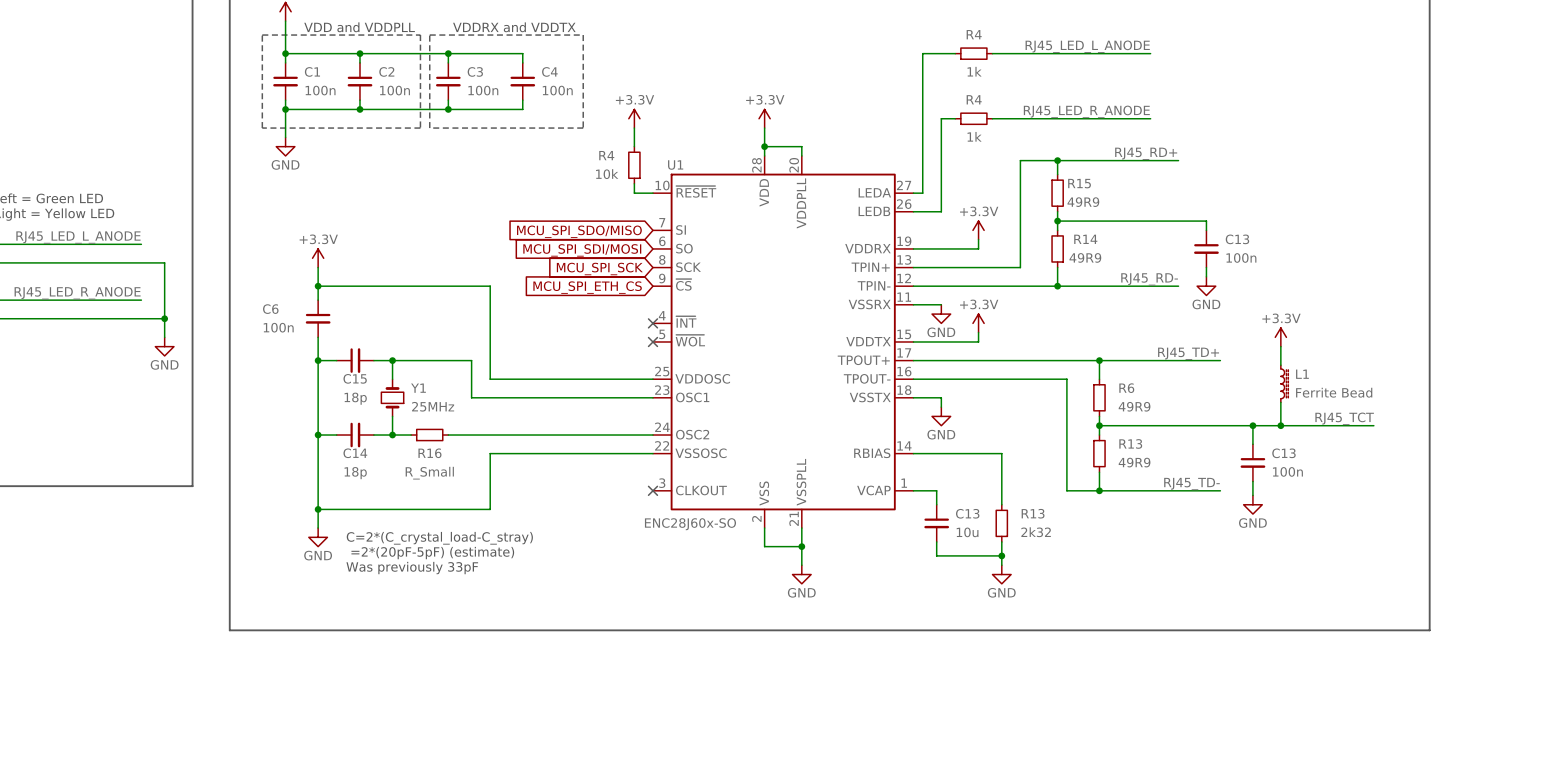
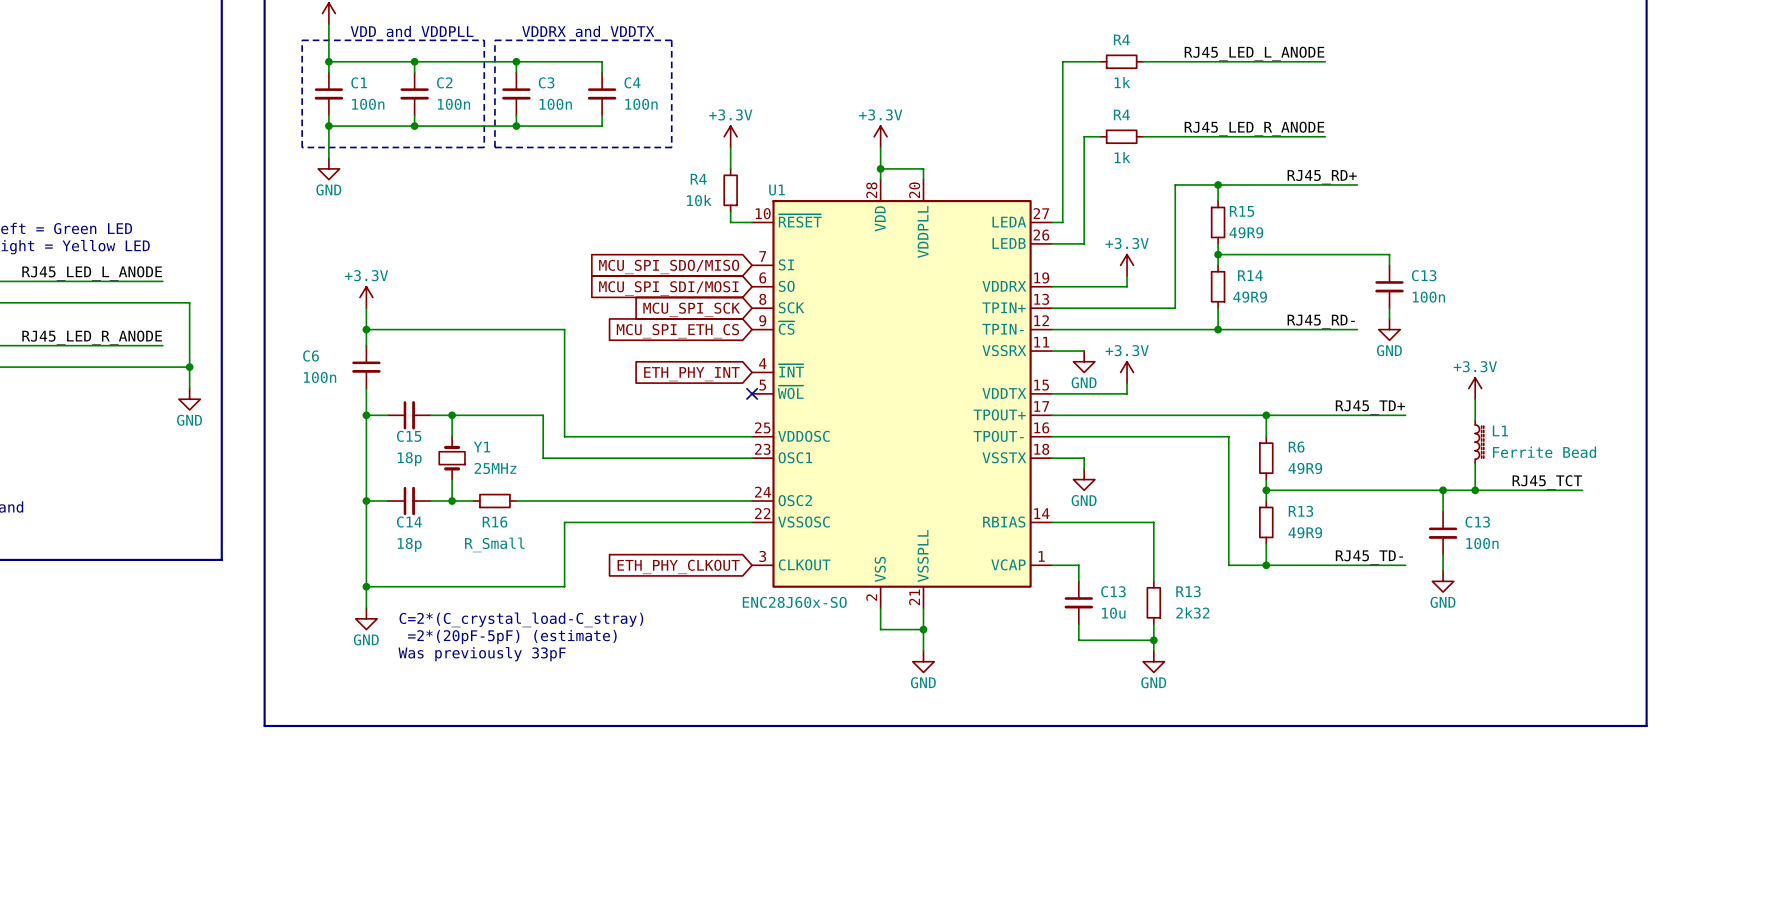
no-connect mark: (652, 323) -> none
global label: none -> ETH_PHY_INT (691, 374)
no-connect mark: (652, 490) -> none
global label: none -> ETH_PHY_CLKOUT (678, 566)

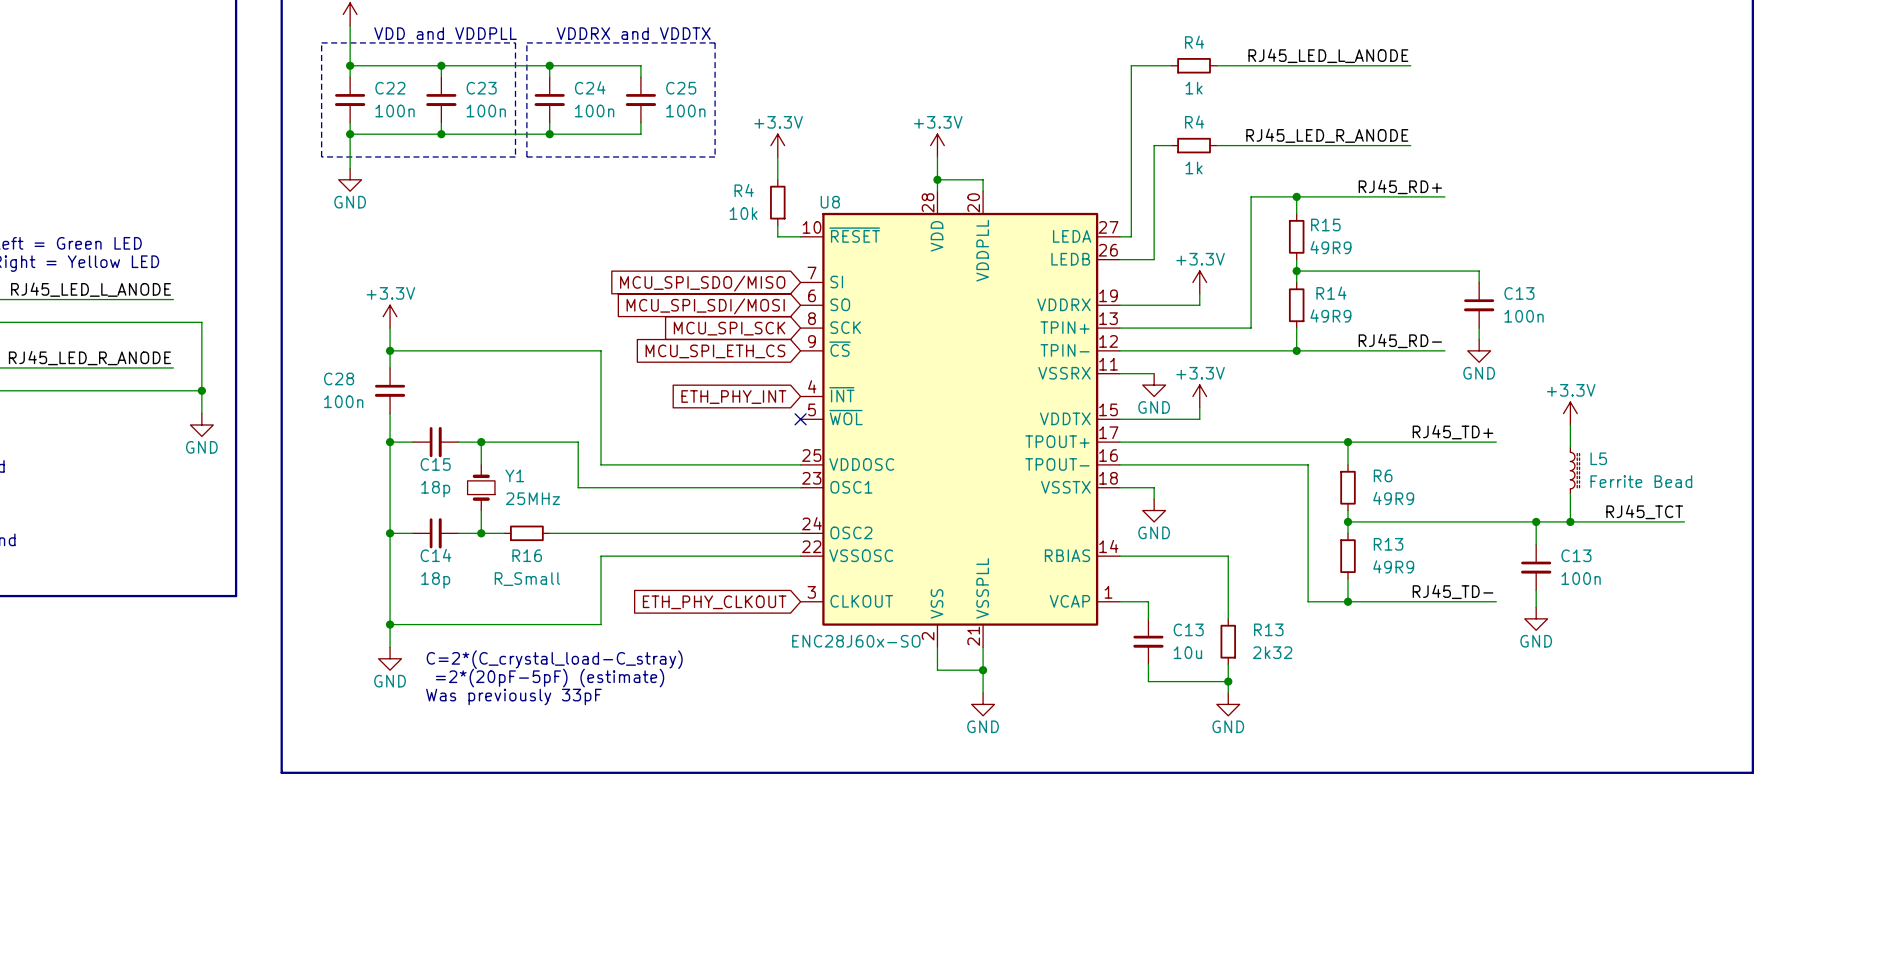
C1 name: C1 (359, 82) -> C22 (390, 88)
C2 name: C2 (444, 82) -> C23 (481, 88)
C3 name: C3 (546, 82) -> C24 (590, 87)
C4 name: C4 (632, 82) -> C25 (681, 88)
U1 name: U1 (777, 190) -> U8 (830, 202)
C6 name: C6 (310, 355) -> C28 (339, 378)
L1 name: L1 (1500, 430) -> L5 (1598, 458)

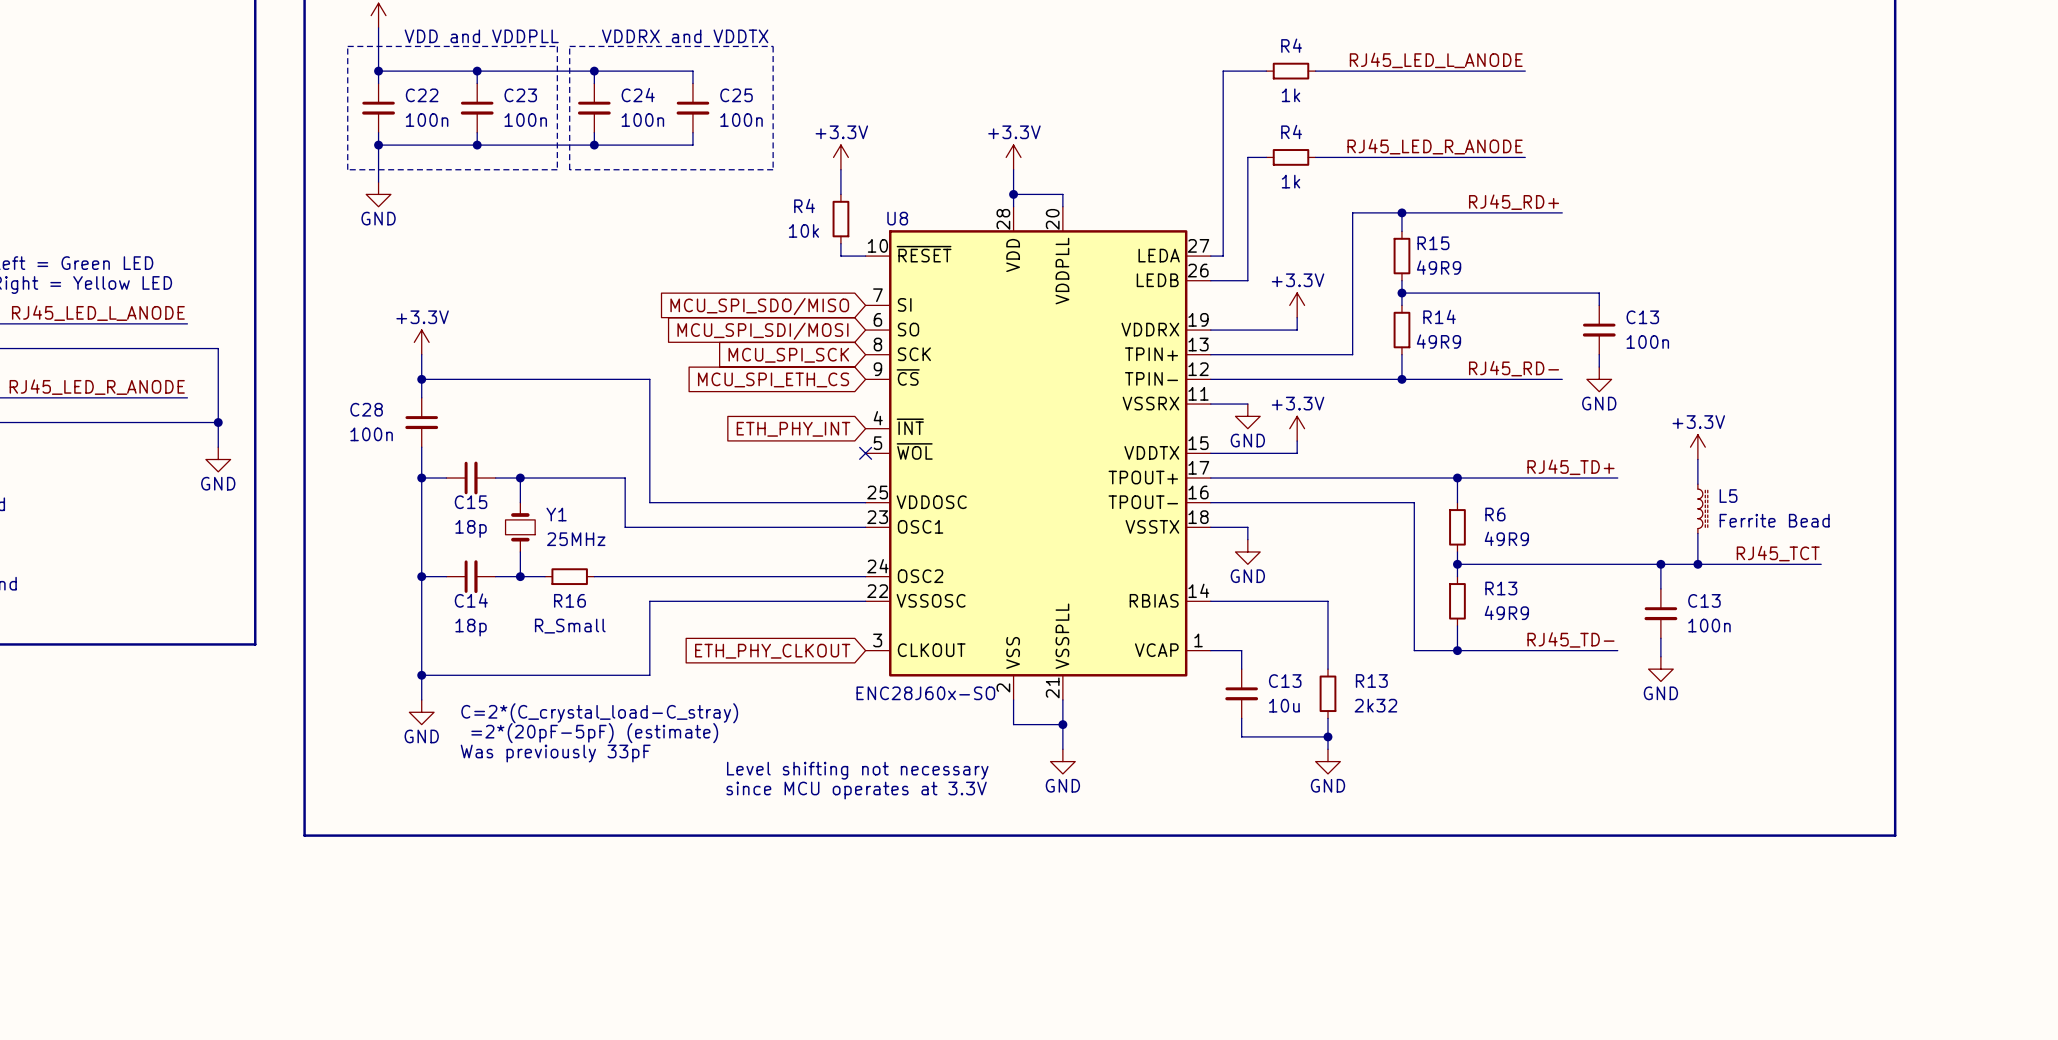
text: none -> Level shifting not necessary (857, 770)
text: none -> since MCU operates at 3.3V (856, 790)

